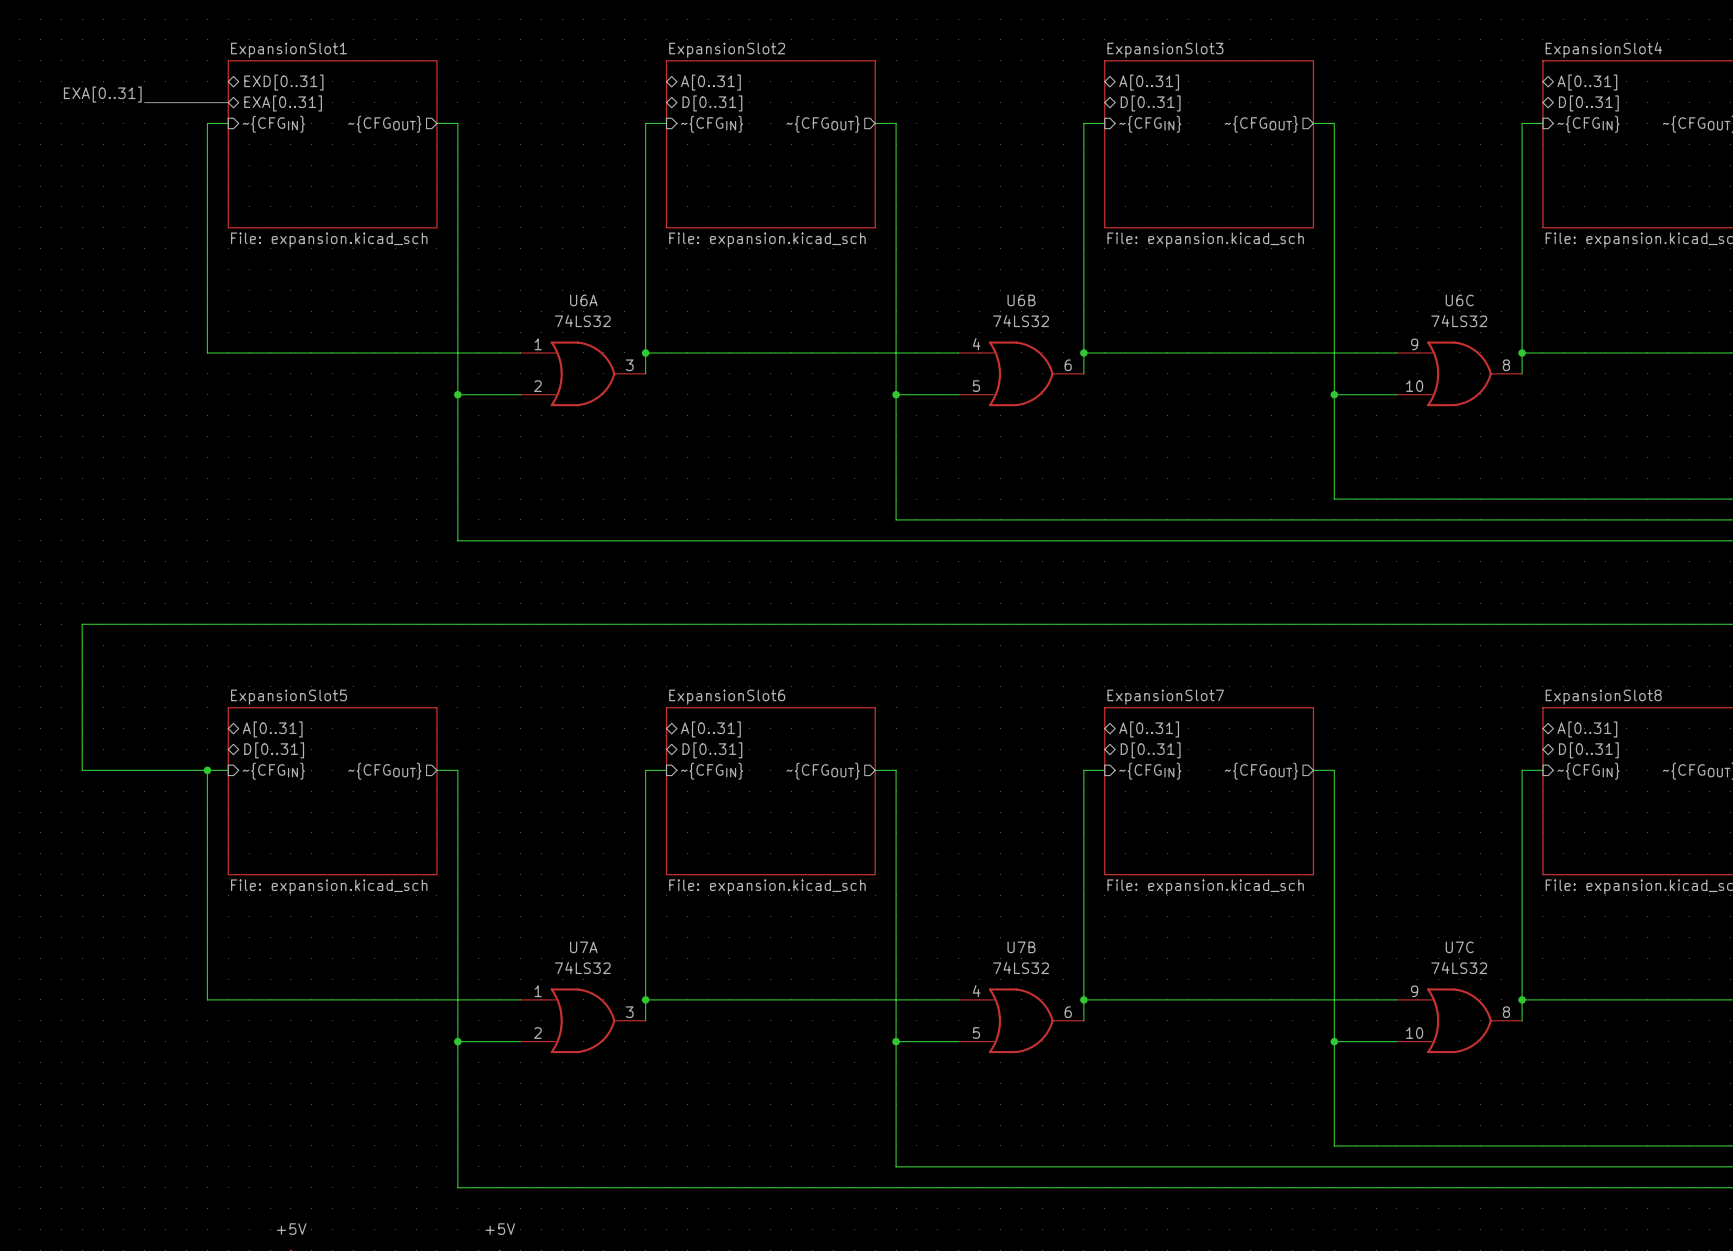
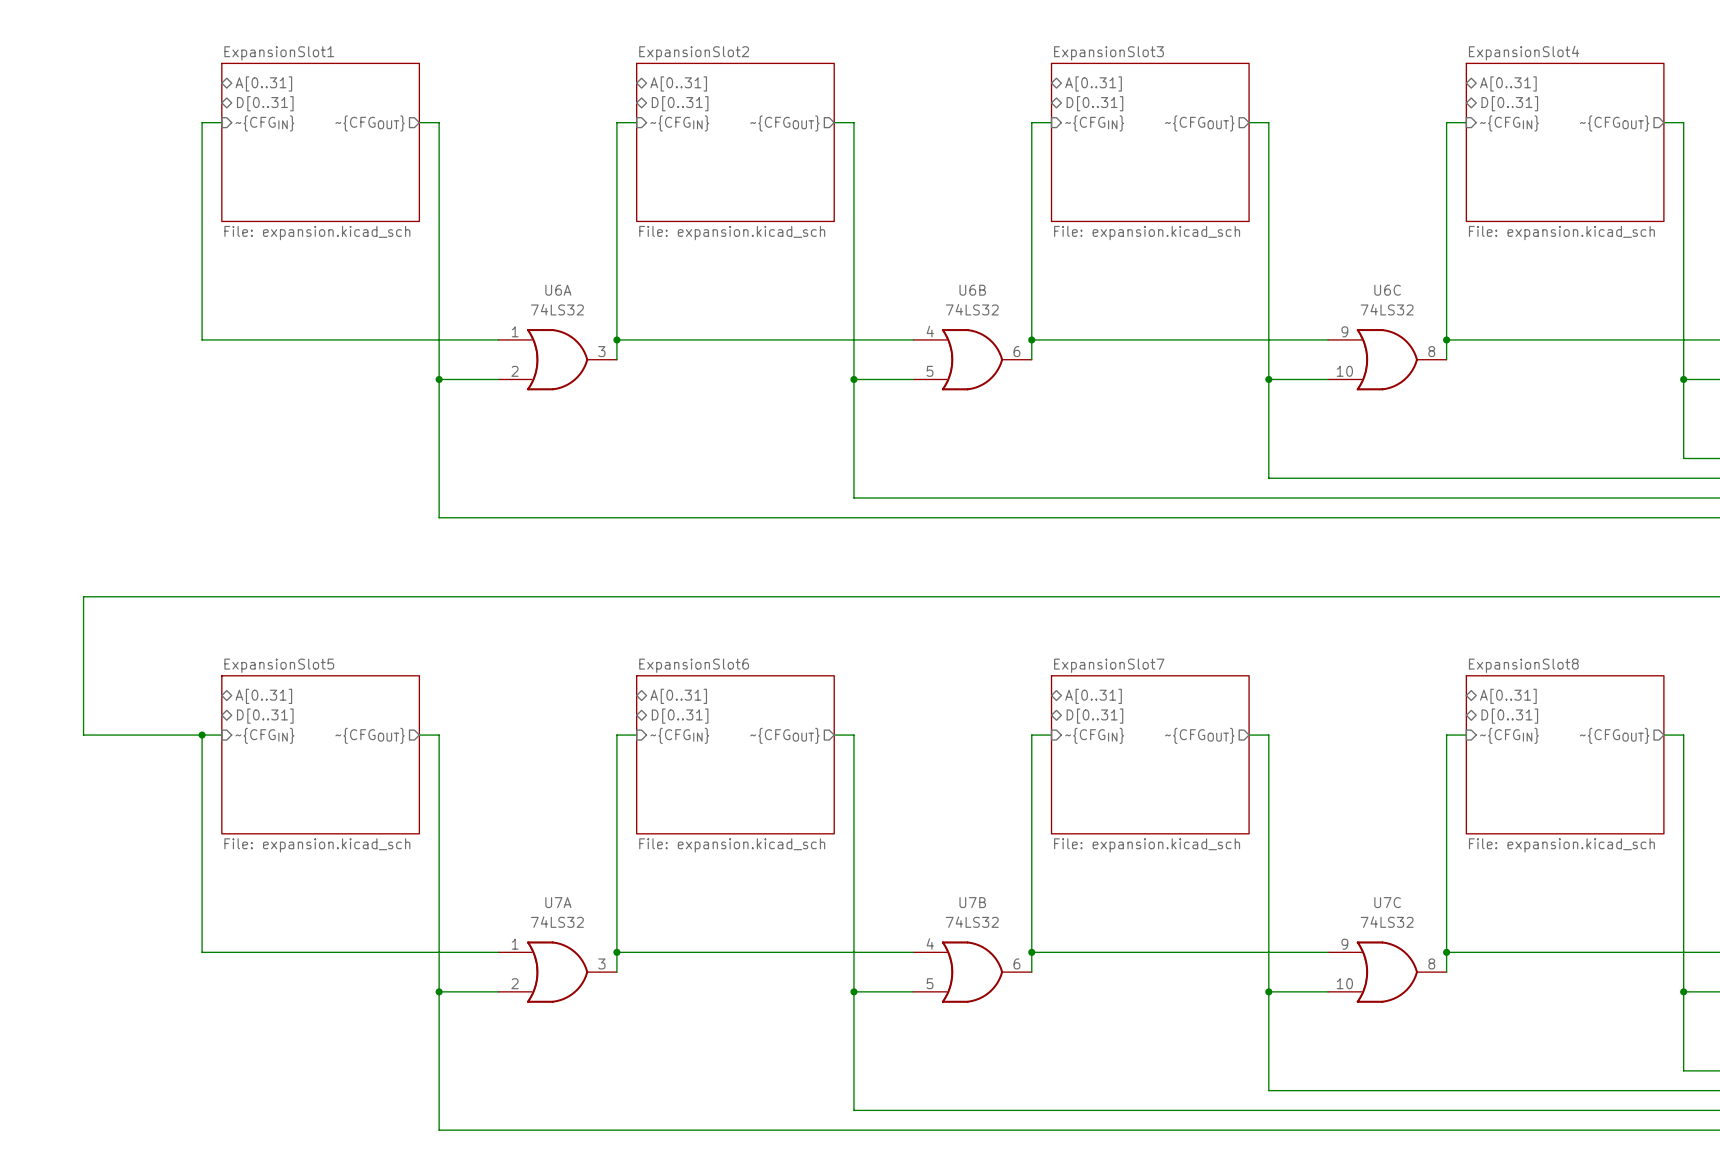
sheet pin: EXD[0..31] (283, 82) -> A[0..31] (263, 83)
label: EXA[0..31] (102, 94) -> none
bus: (144, 102) (228, 102) -> none
sheet pin: EXA[0..31] (283, 103) -> D[0..31] (265, 103)

